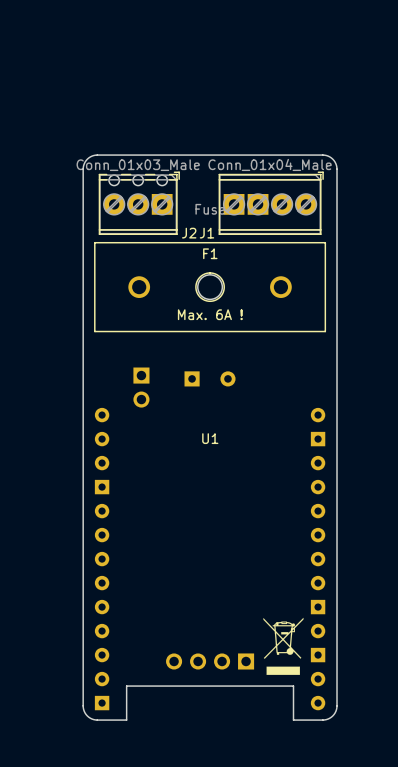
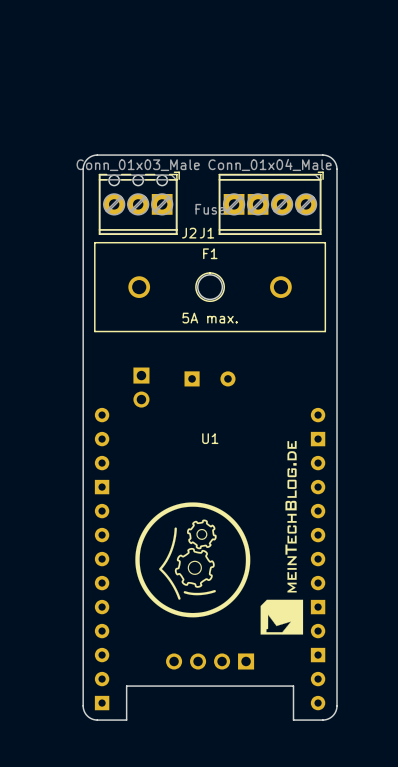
text: Max. 6A ! (210, 314) -> 5A max. (210, 318)
drawing: none -> [135, 440, 304, 635]
drawing: [263, 617, 304, 675] -> none

